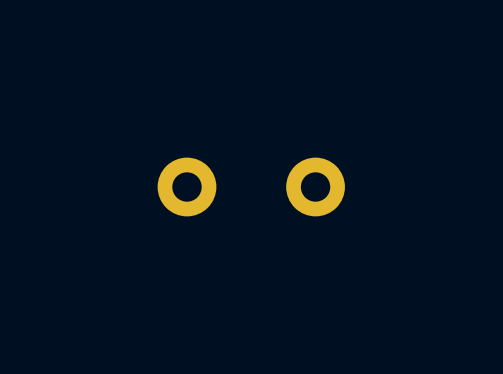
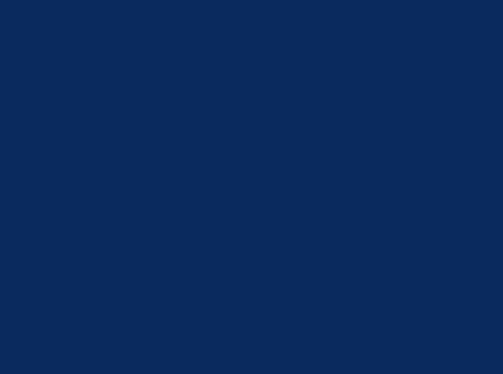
part: (251, 187) -> none

